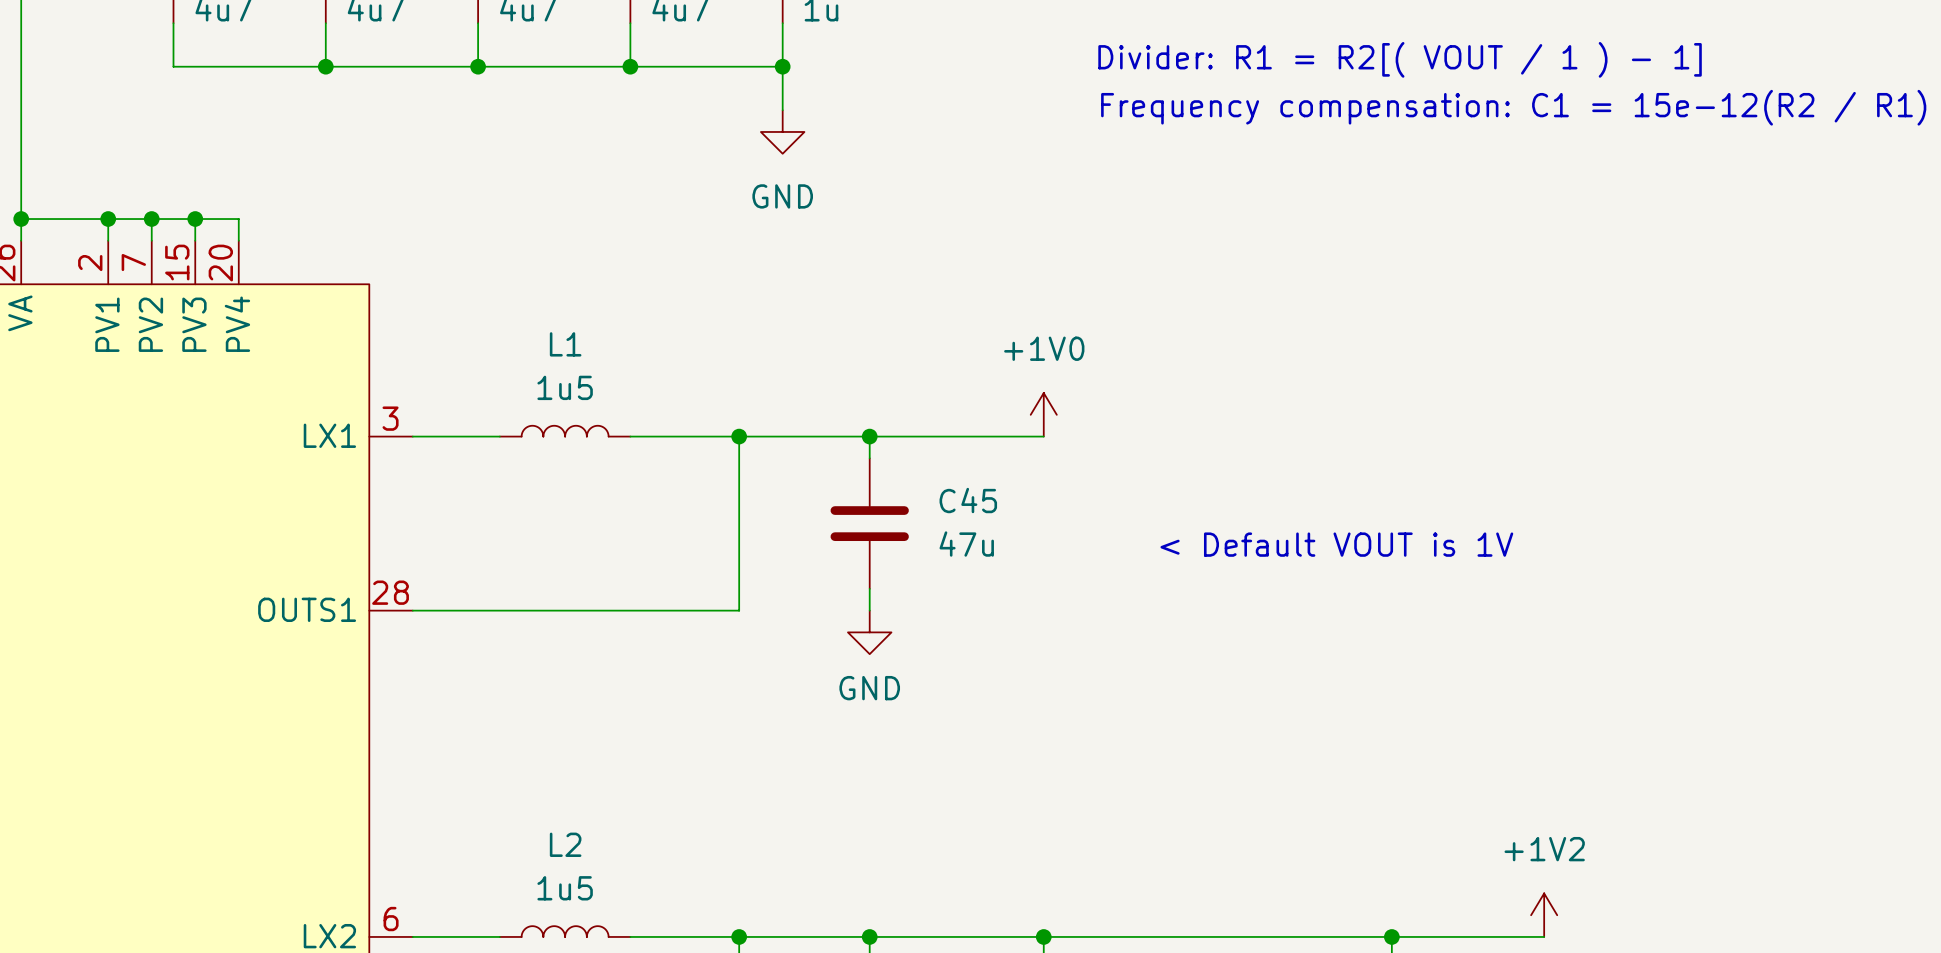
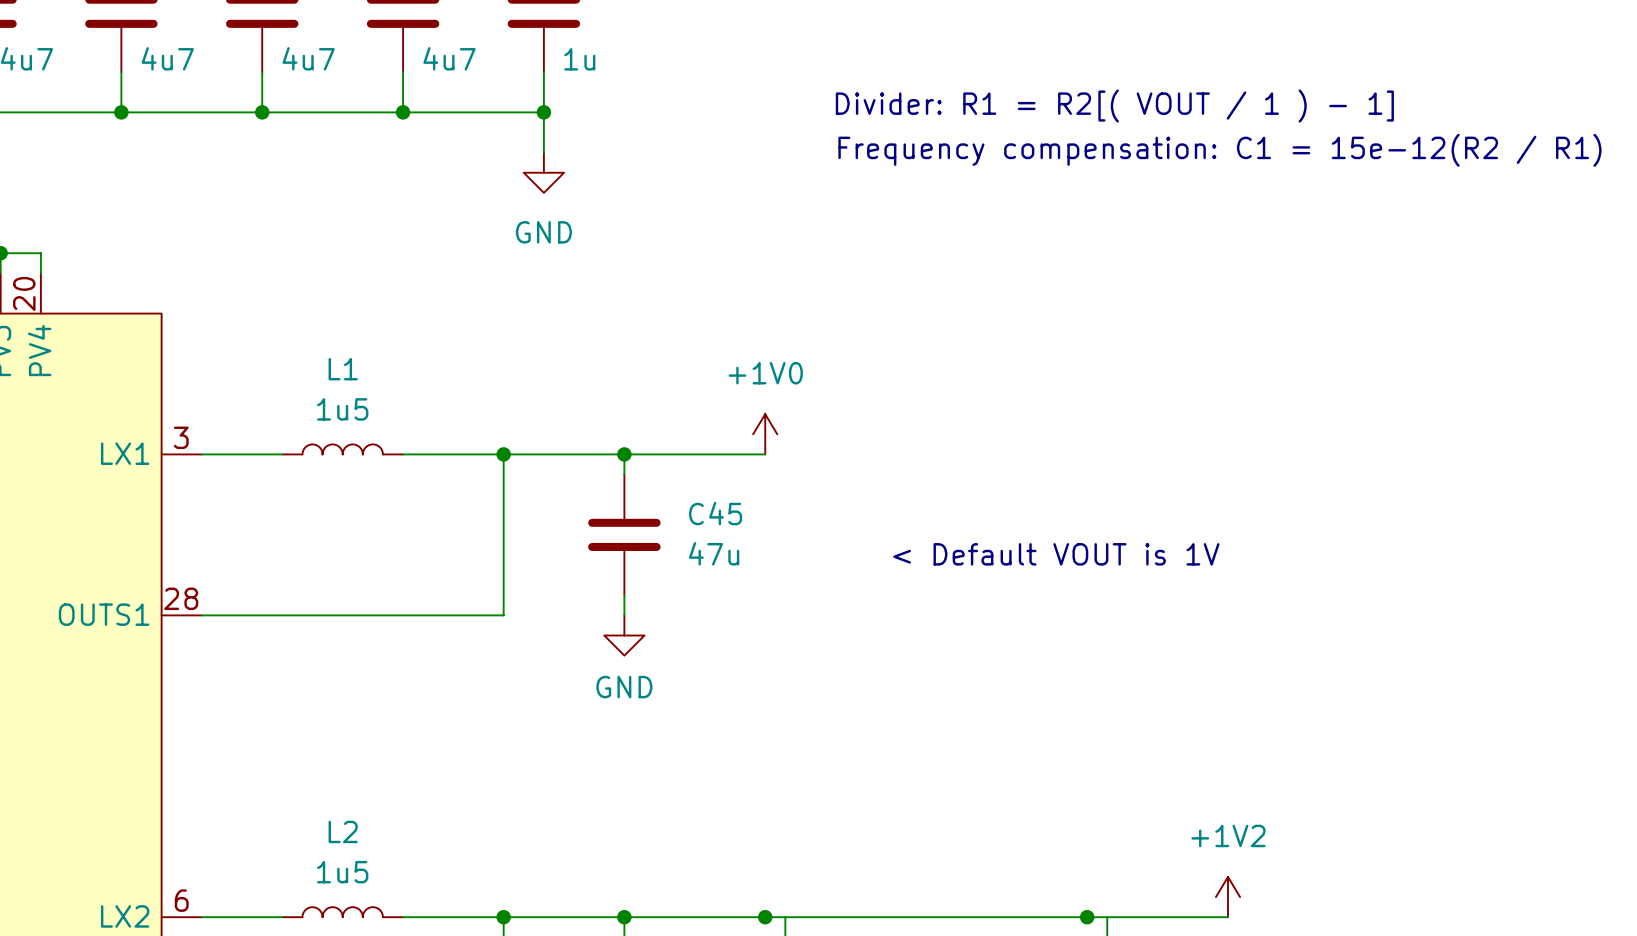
power symbol position: +1V0 (1043, 414) -> +1V0 (765, 434)
wire: (1022, 436) (1043, 436) -> none
power symbol position: +1V2 (1544, 915) -> +1V2 (1228, 897)
junction position: (1043, 936) -> (765, 917)
junction position: (1391, 936) -> (1087, 917)
wire: (1522, 936) (1544, 936) -> none

